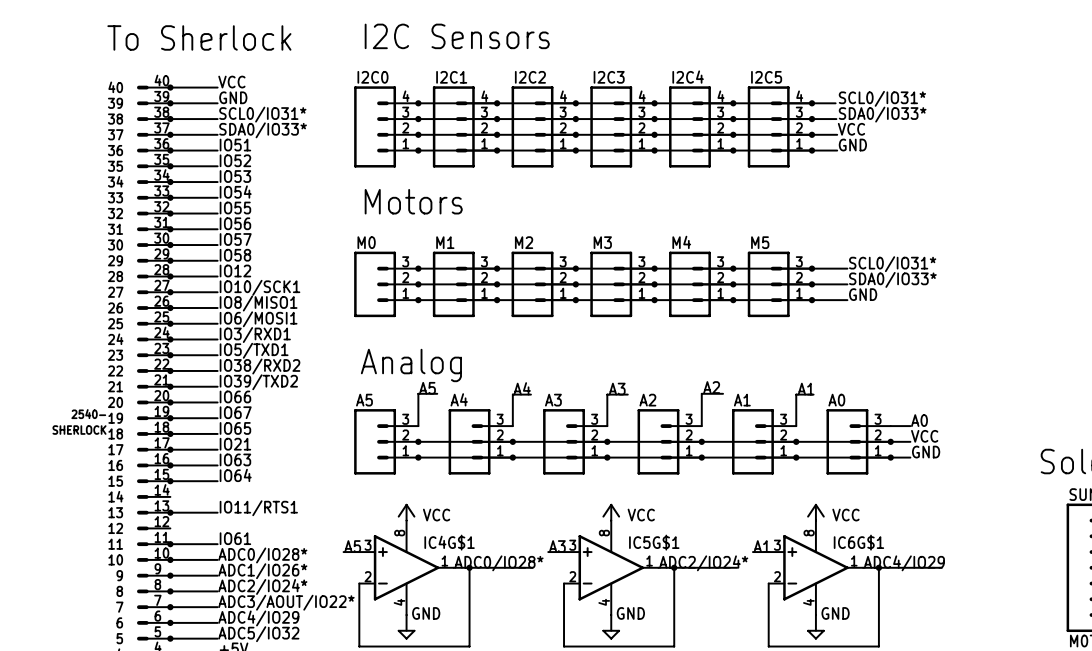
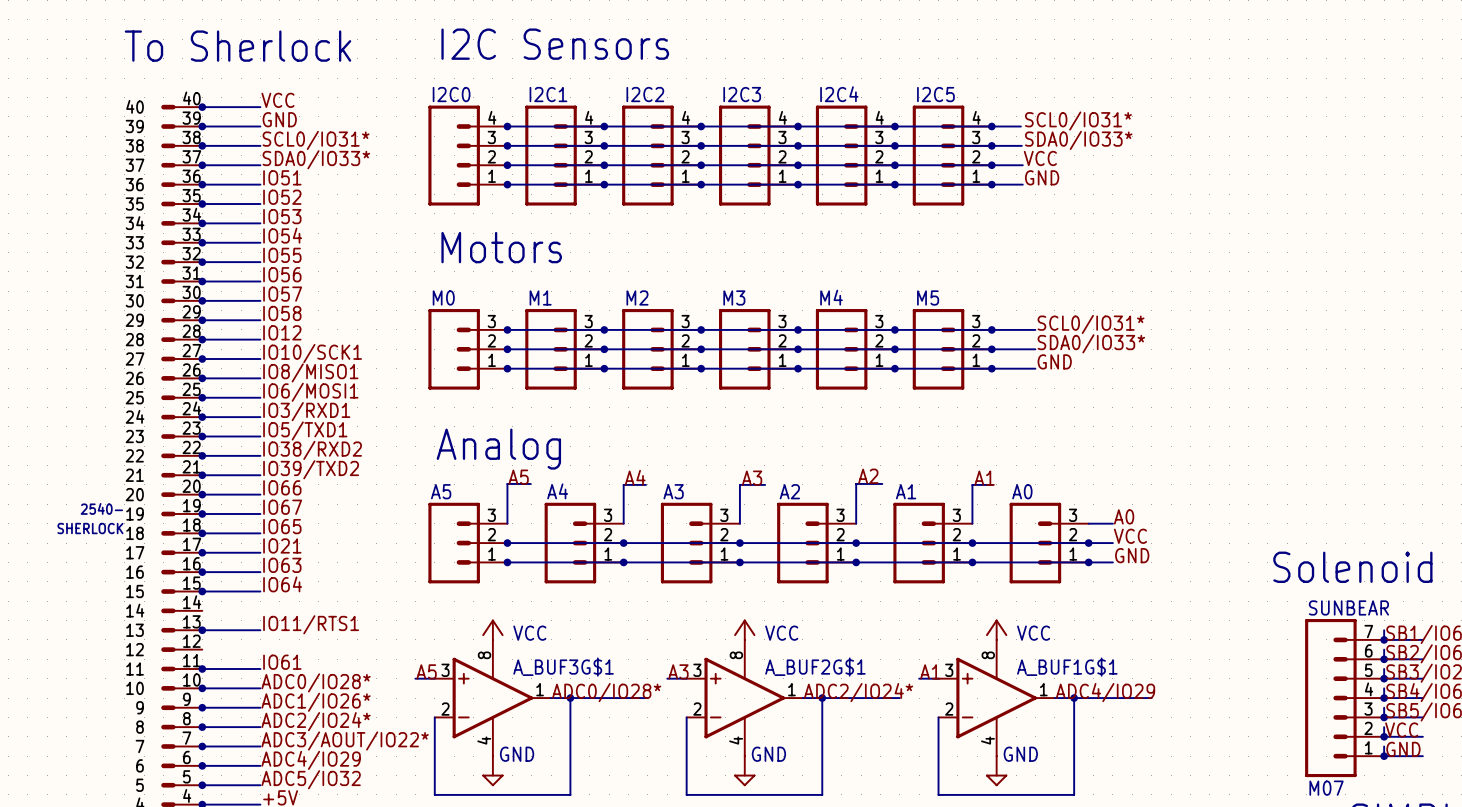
IC4G$1 name: IC4G$1 (449, 542) -> A_BUF3G$1 (563, 667)
IC5G$1 name: IC5G$1 (654, 542) -> A_BUF2G$1 (815, 667)
IC6G$1 name: IC6G$1 (858, 542) -> A_BUF1G$1 (1067, 667)

